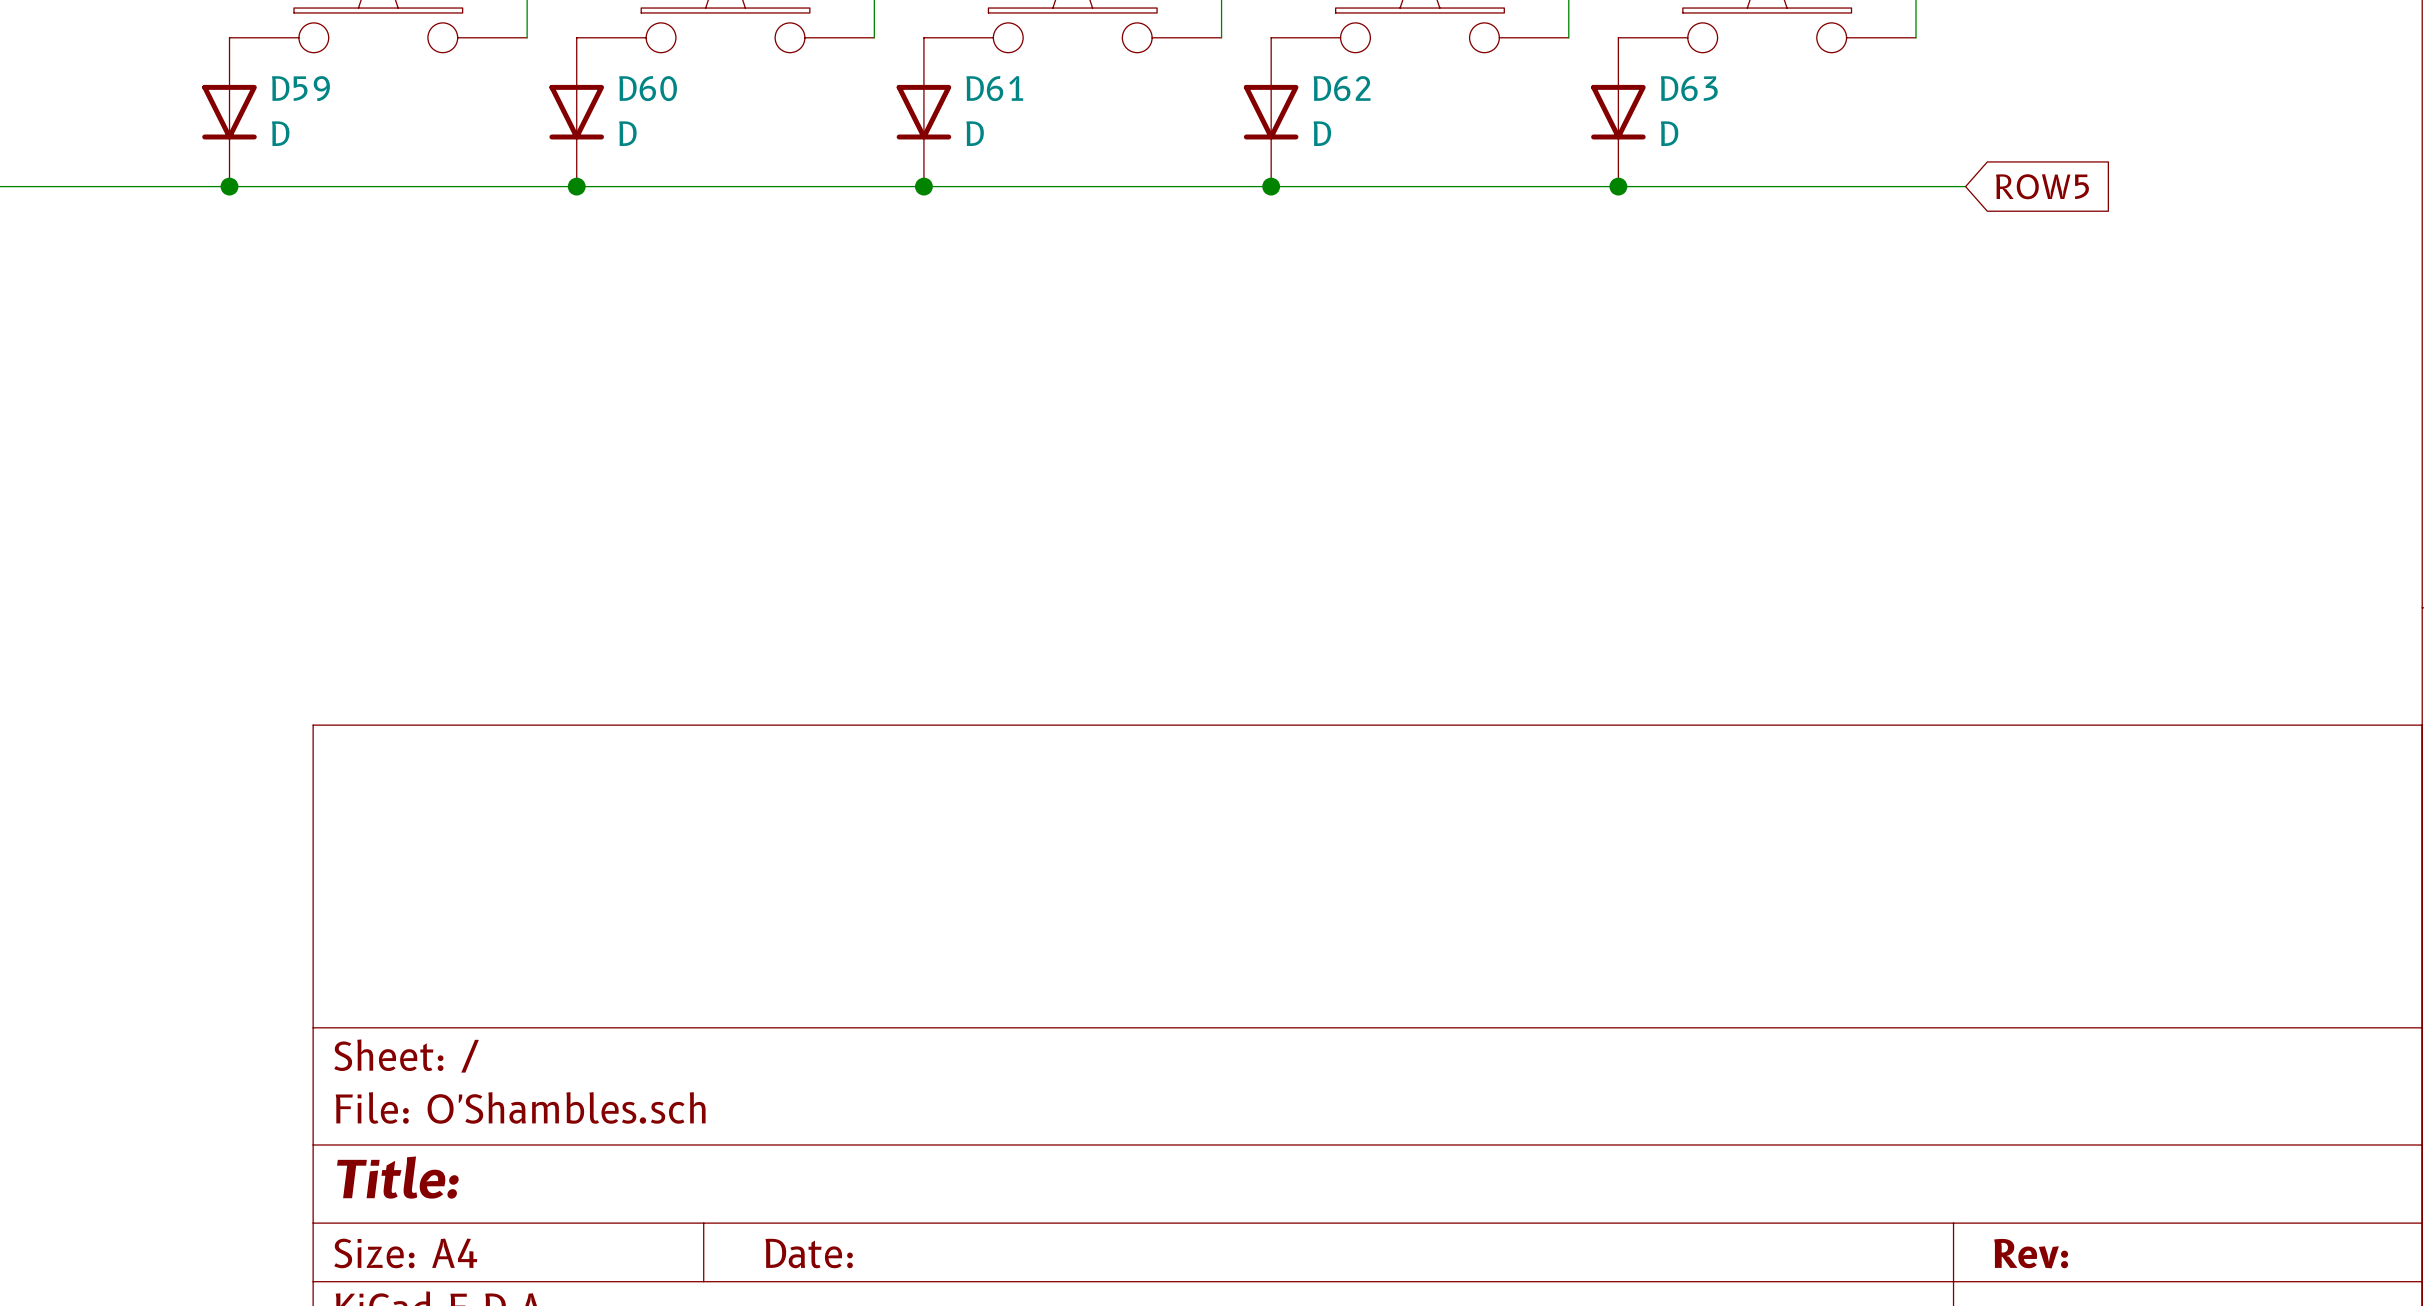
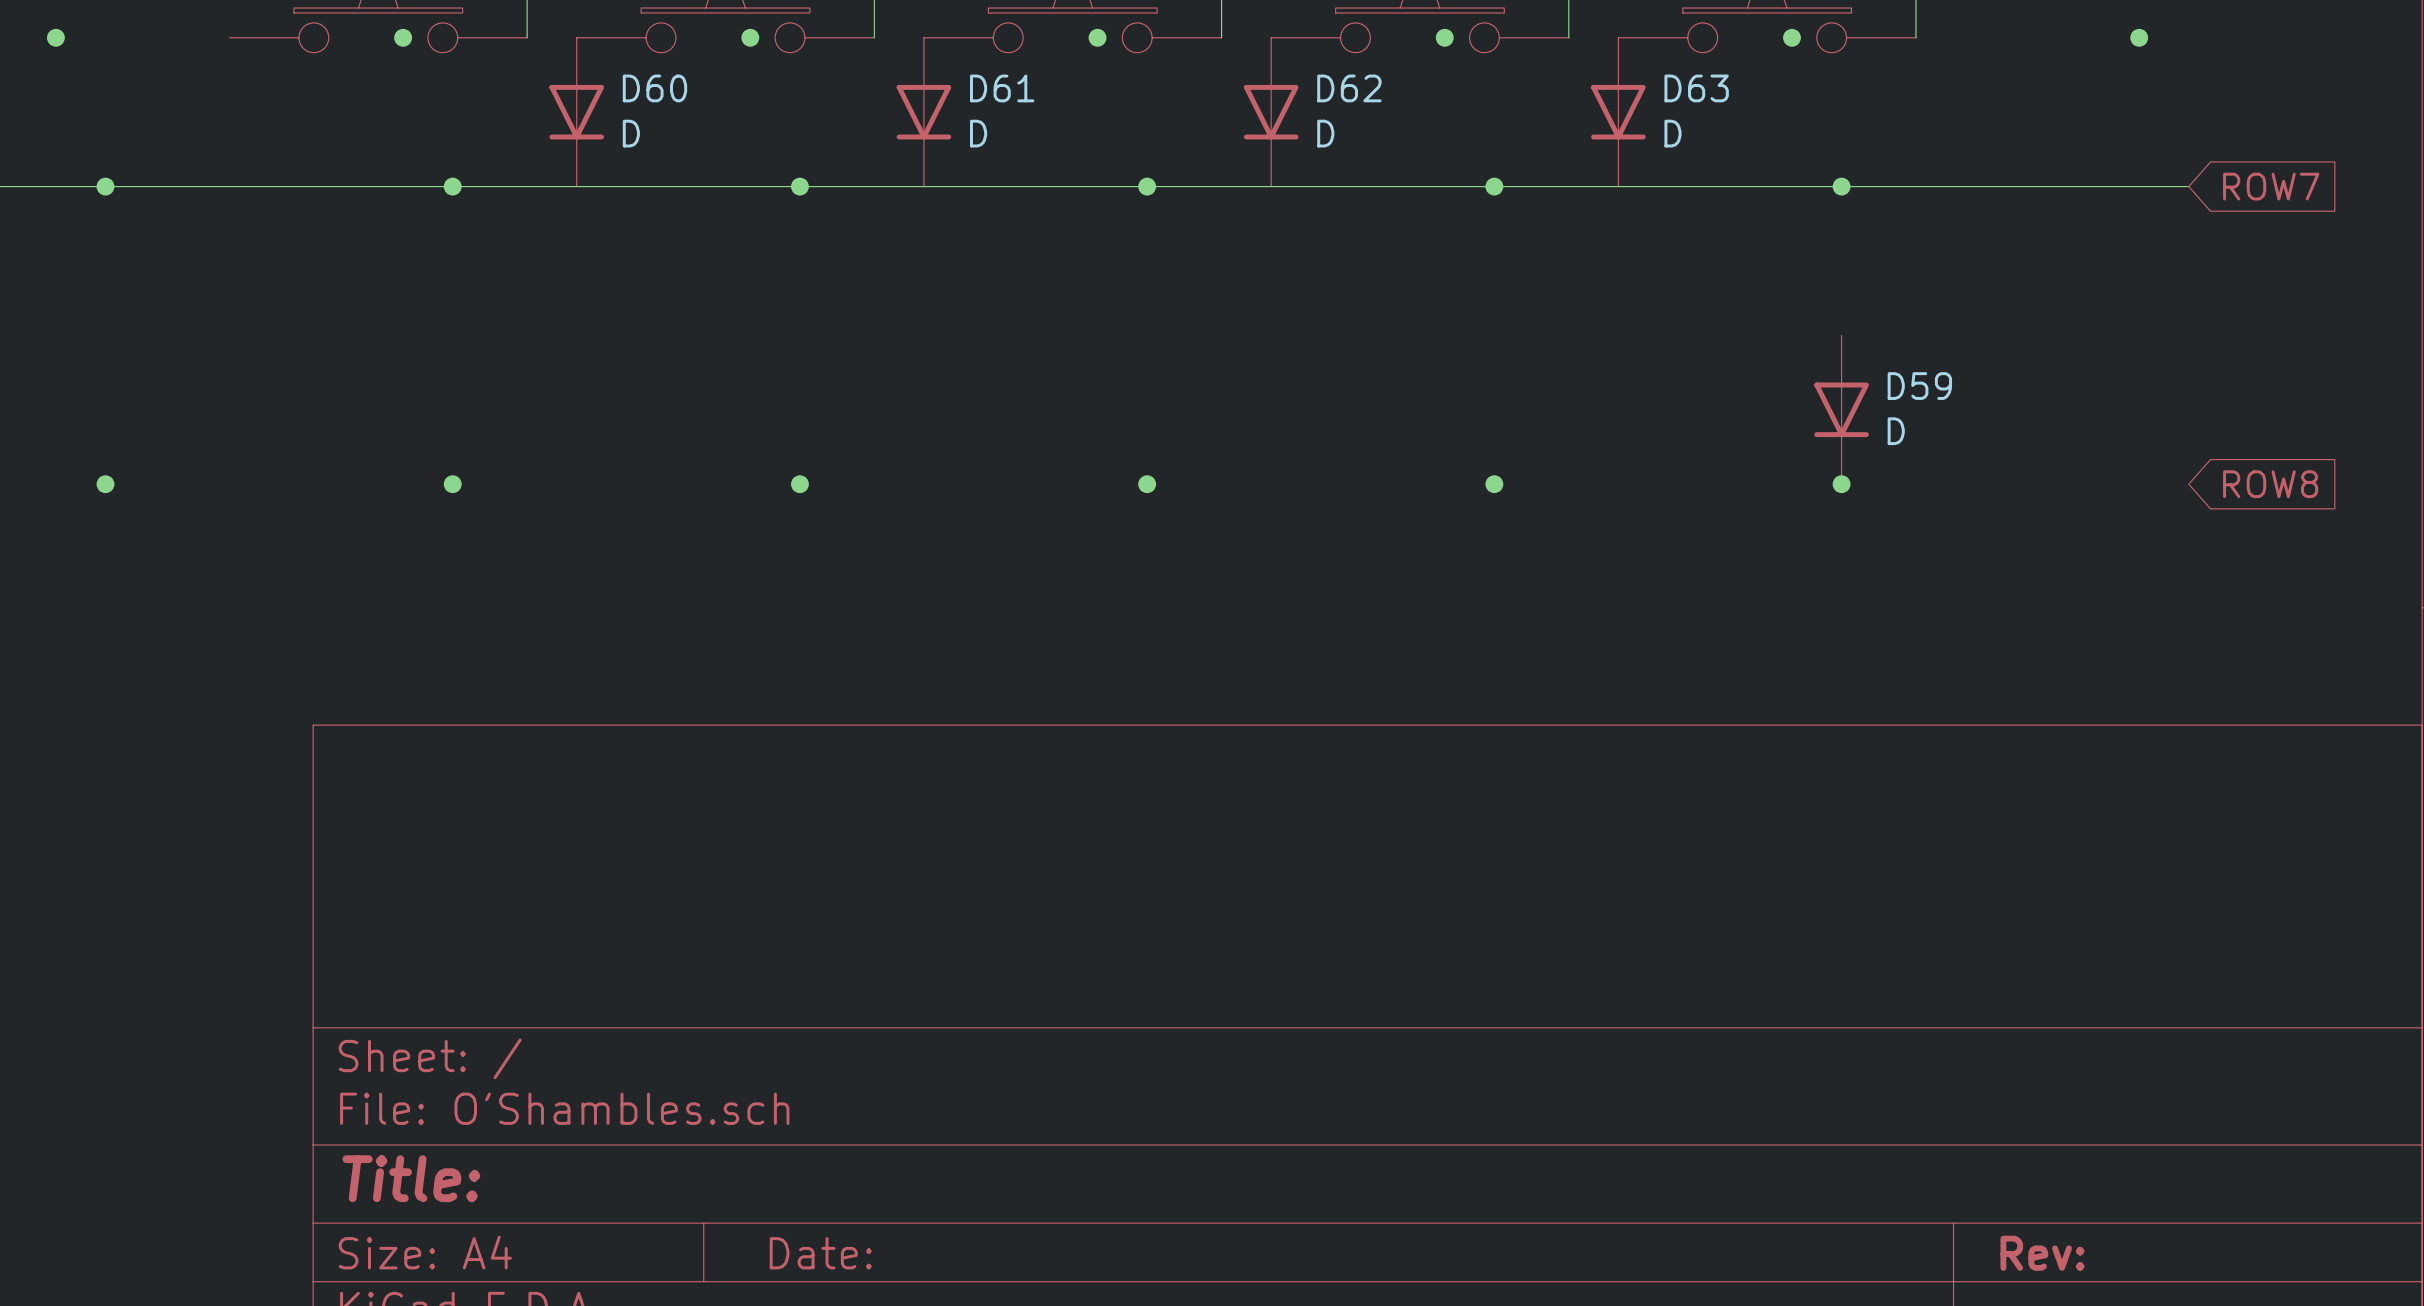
junction: none -> (55, 37)
junction: none -> (403, 37)
junction: none -> (750, 37)
junction: none -> (1097, 37)
junction: none -> (1444, 37)
junction: none -> (1791, 37)
junction: none -> (2139, 37)
D59 position: (229, 112) -> (1841, 409)
junction: none -> (105, 186)
junction: (229, 186) -> none
junction: none -> (452, 186)
junction: (576, 186) -> none
junction: none -> (799, 186)
junction: (923, 186) -> none
junction: none -> (1147, 186)
junction: (1271, 186) -> none
junction: none -> (1494, 186)
junction: (1618, 186) -> none
junction: none -> (1841, 186)
wire: none -> (1965, 186) (2188, 186)
global label: ROW5 (2042, 186) -> none
global label: none -> ROW7 (2271, 186)
junction: none -> (105, 484)
junction: none -> (452, 484)
junction: none -> (799, 484)
junction: none -> (1147, 484)
junction: none -> (1494, 484)
junction: none -> (1841, 484)
global label: none -> ROW8 (2270, 484)

